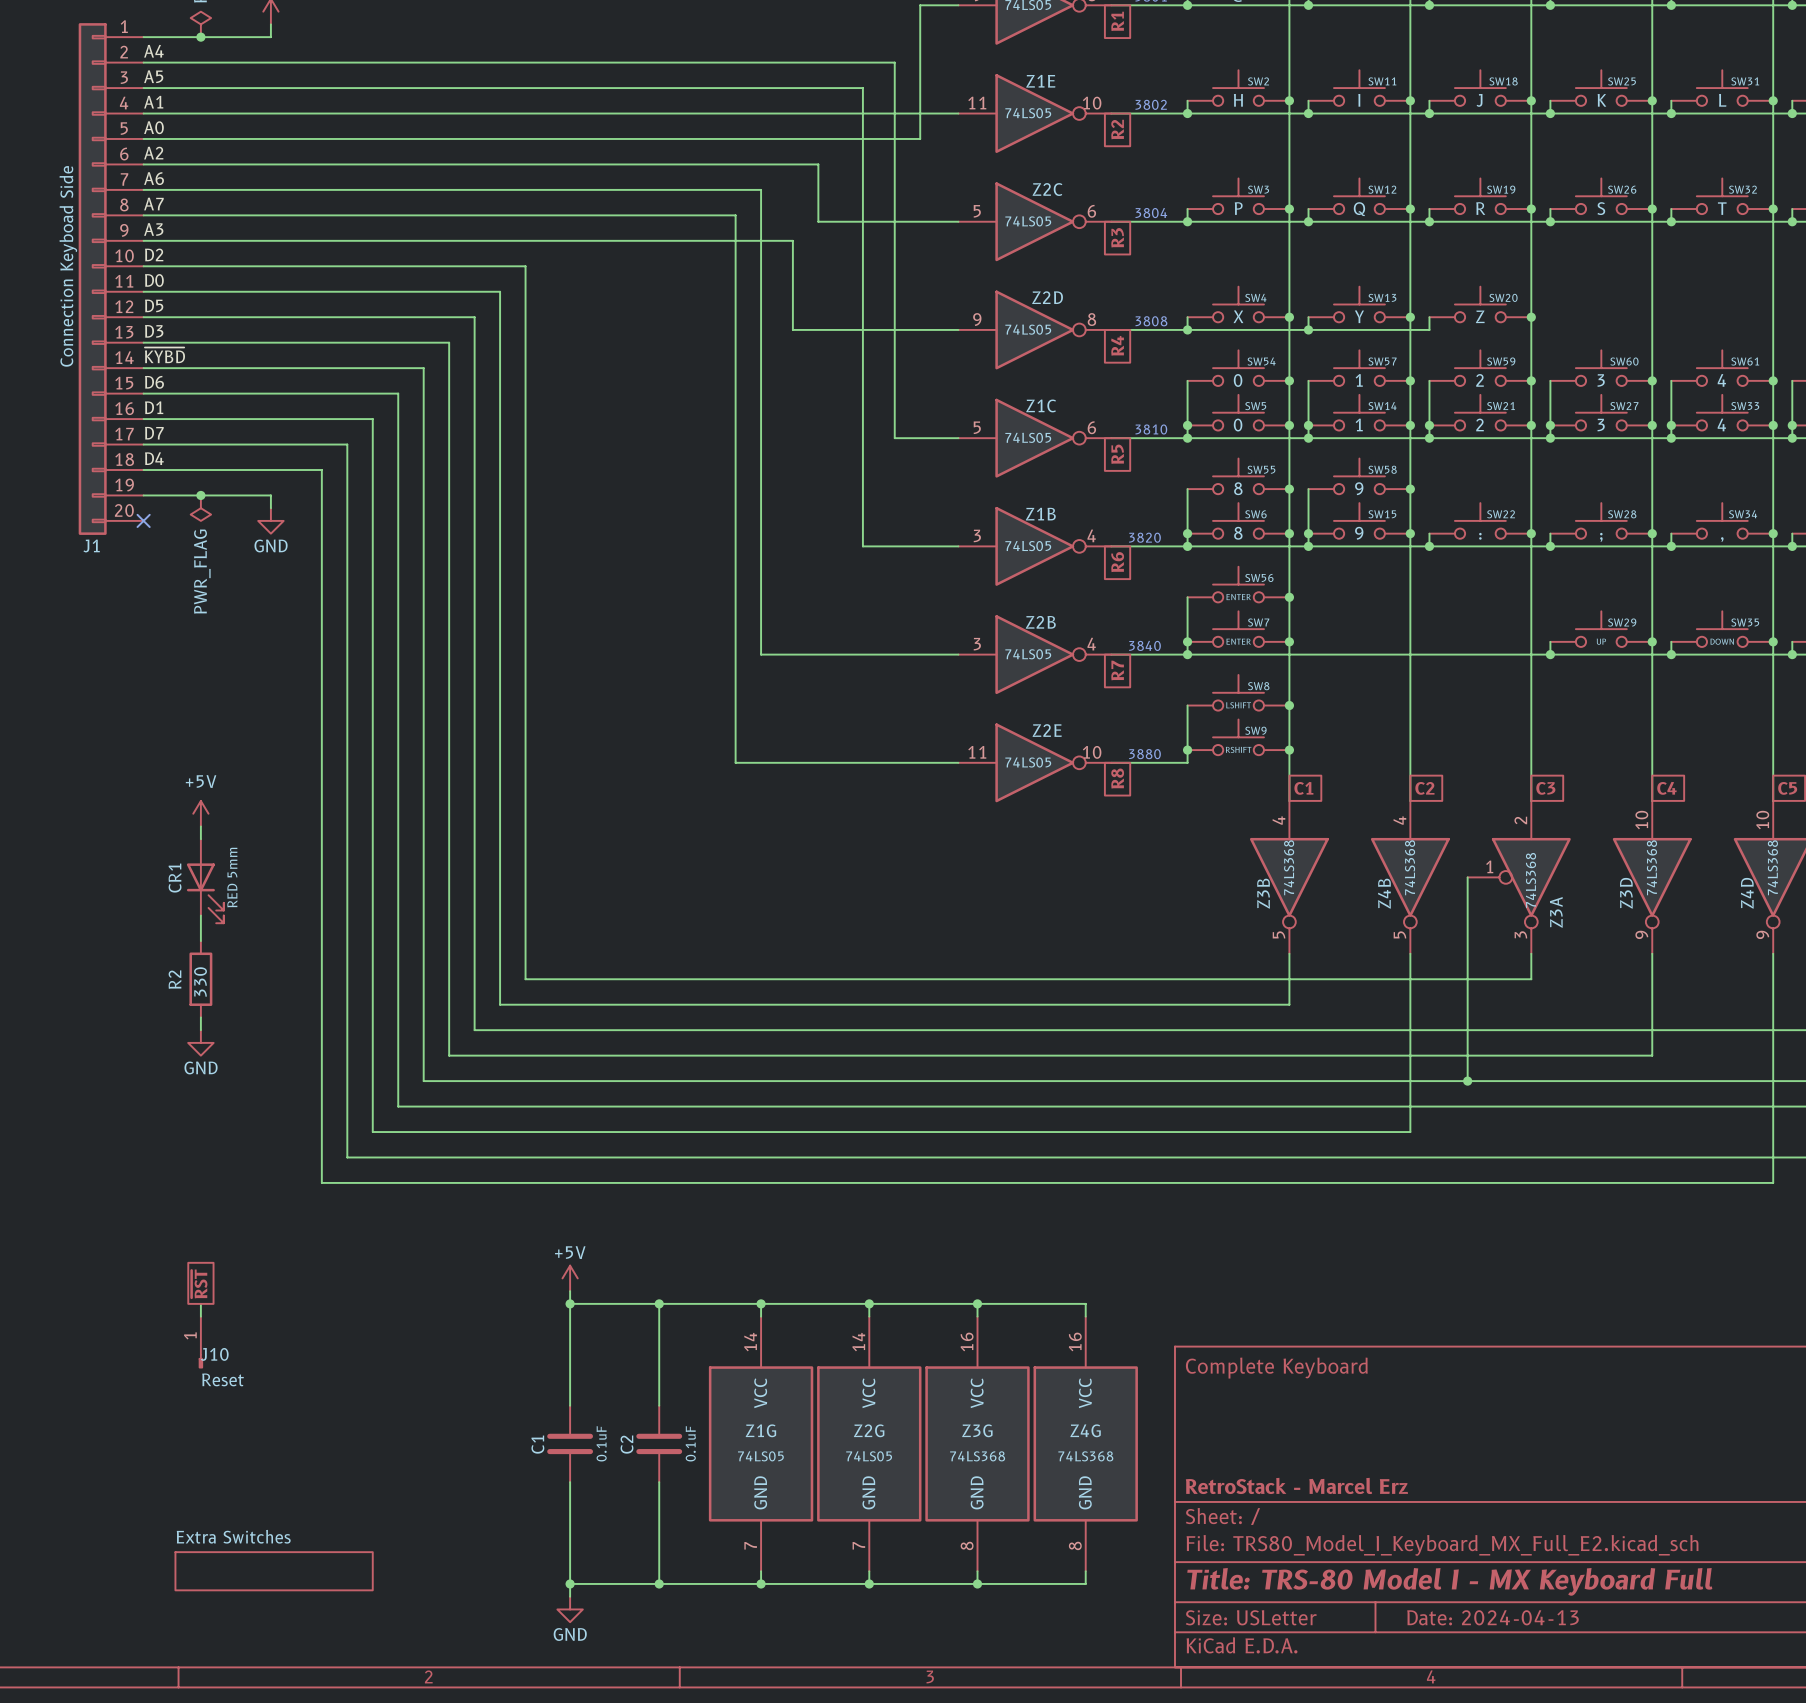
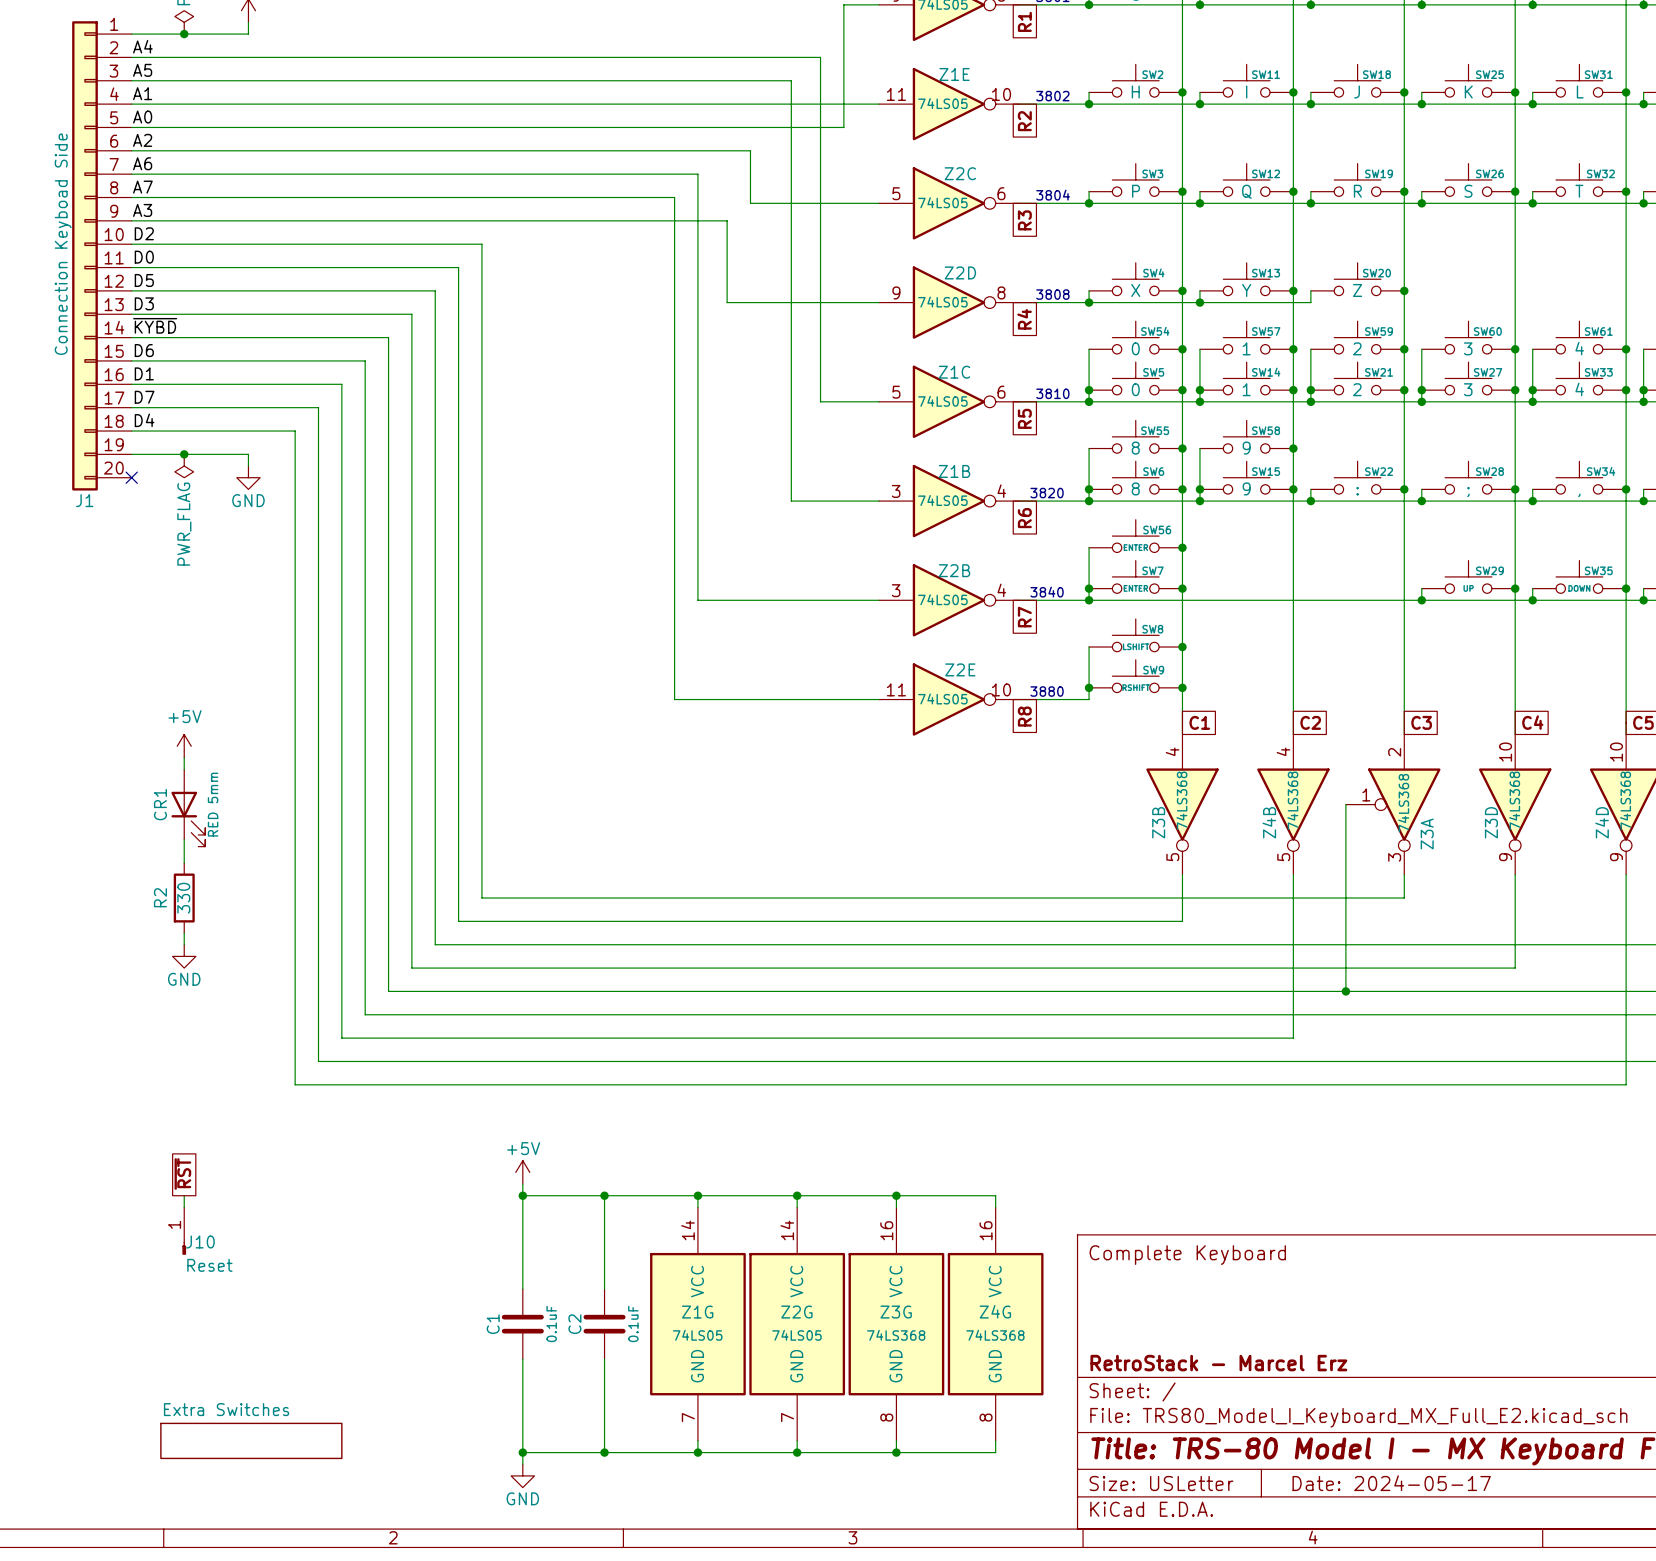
title block: Date: 2024-04-13 (1492, 1617) -> Date: 2024-05-17 (1391, 1483)

